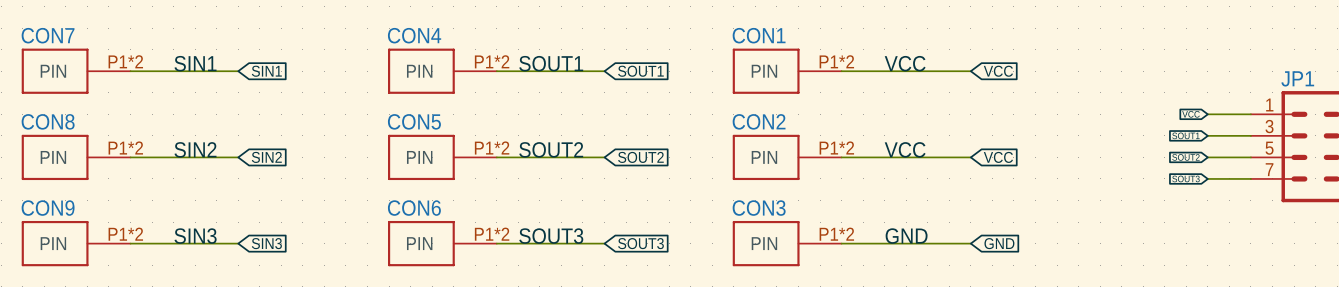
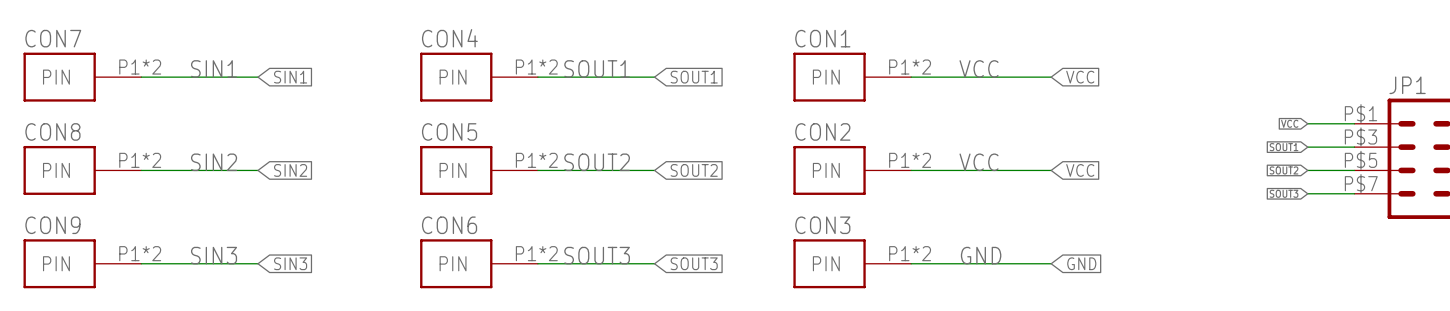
JP1 pin number: 1 (1269, 105) -> P$1 (1360, 113)
JP1 pin number: 3 (1269, 126) -> P$3 (1360, 137)
JP1 pin number: 5 (1269, 148) -> P$5 (1360, 160)
JP1 pin number: 7 (1269, 169) -> P$7 (1361, 183)

